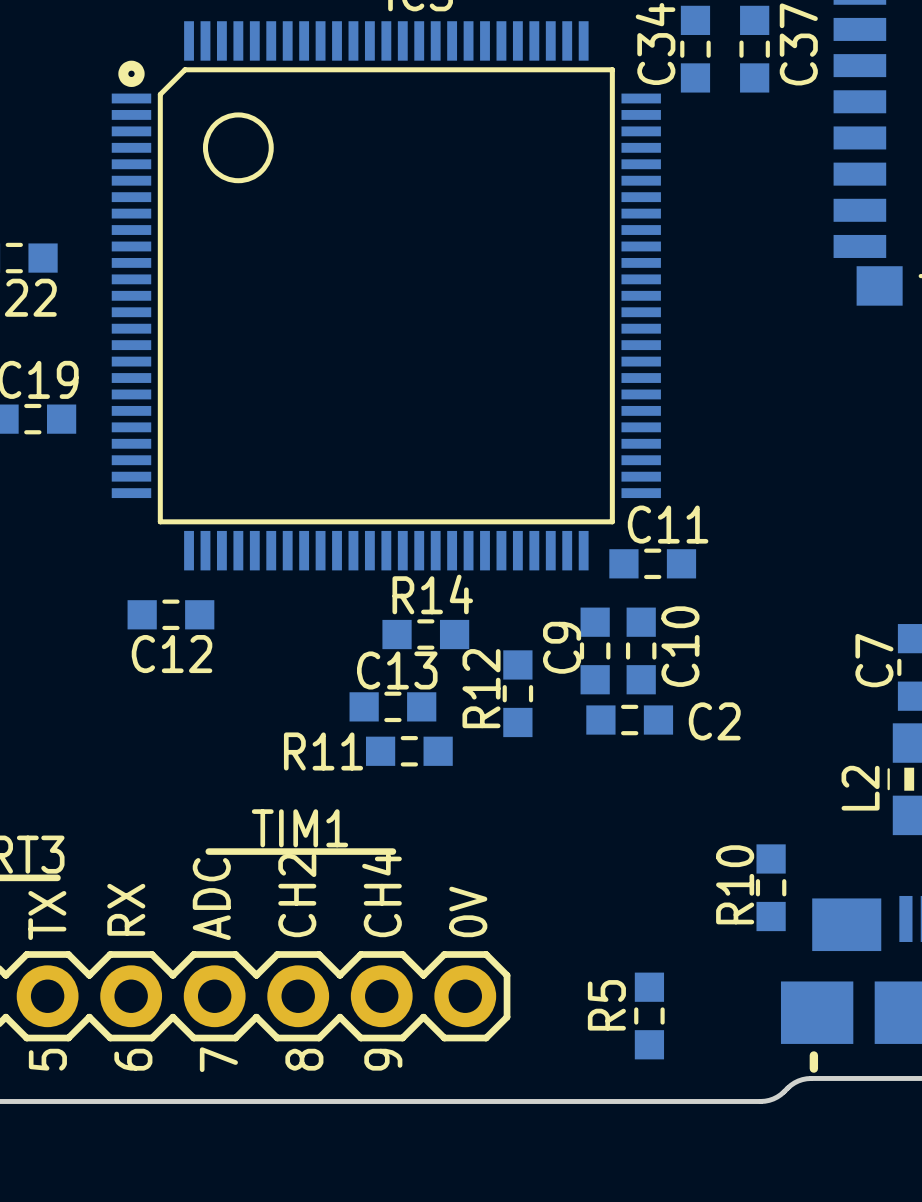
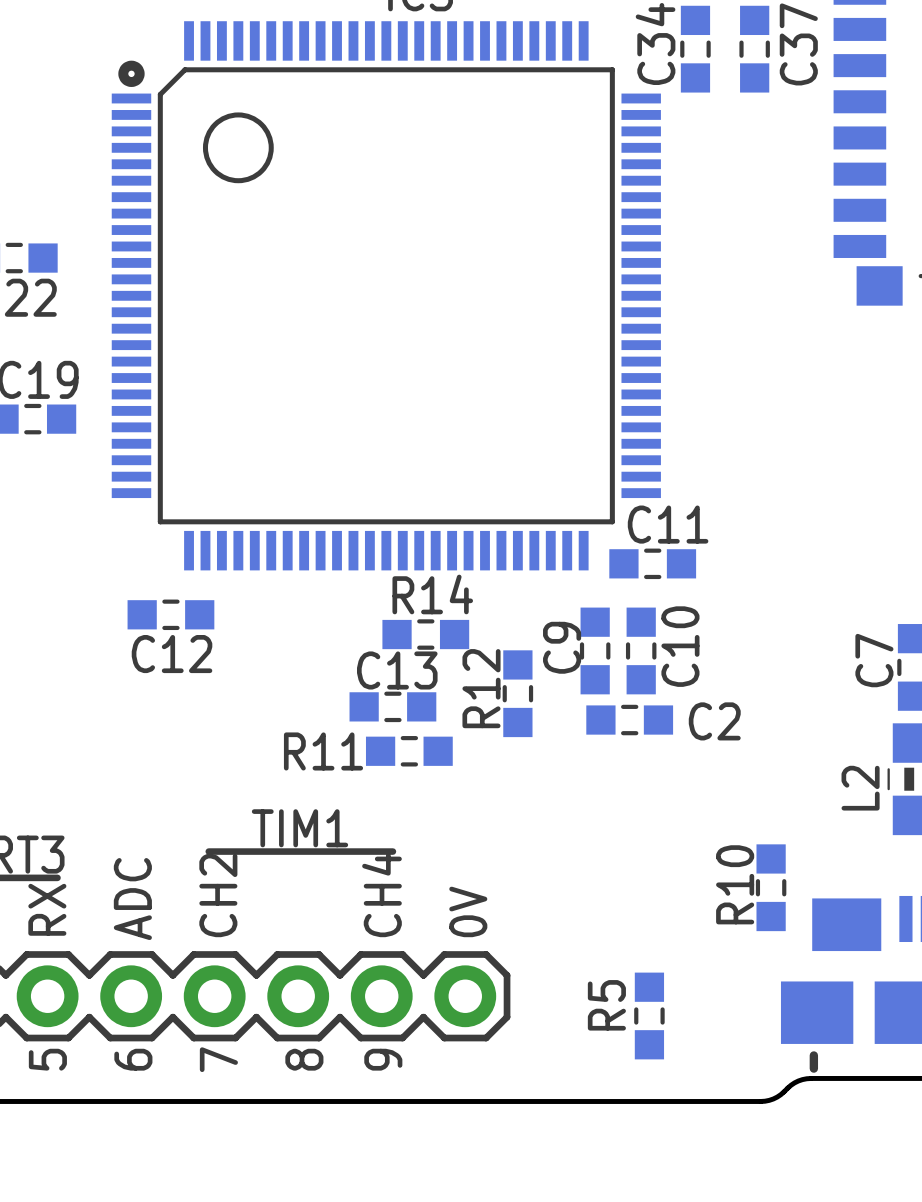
text position: CH2 (297, 895) -> CH2 (218, 895)
text position: ADC (211, 899) -> ADC (132, 899)
text: RX (126, 909) -> none
text: TX (47, 915) -> RX (47, 909)

